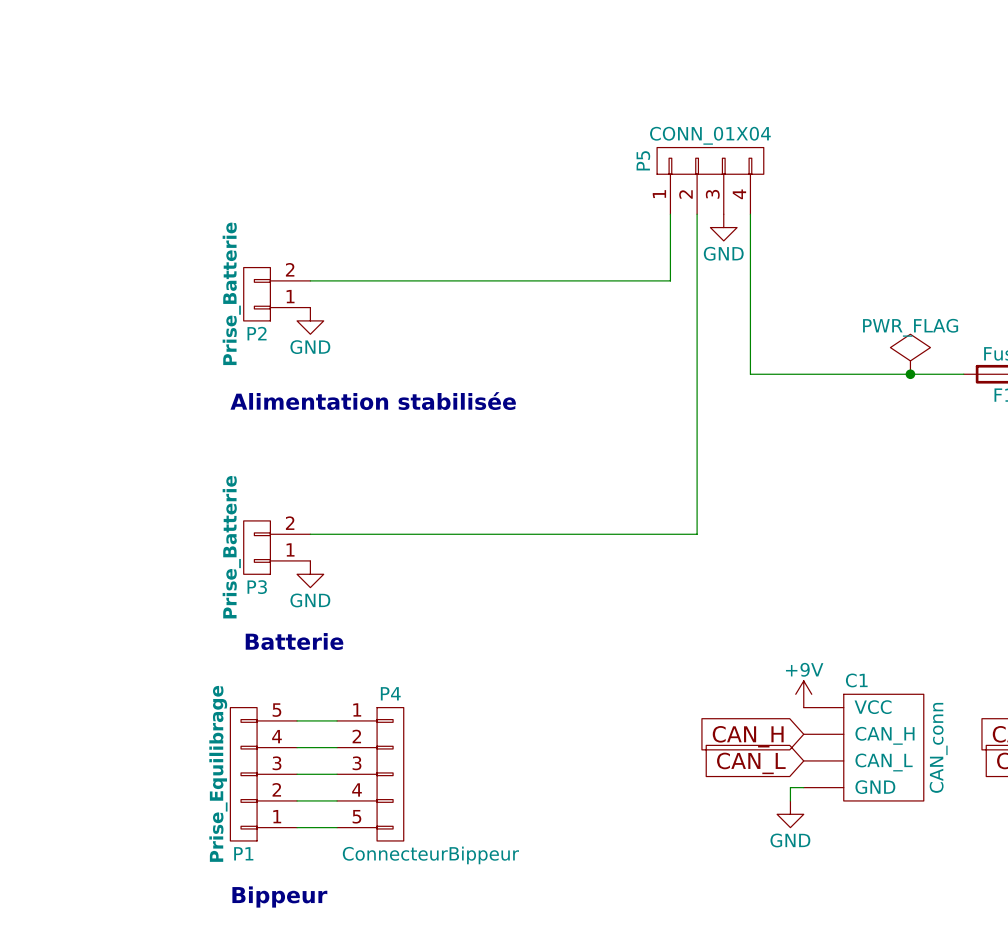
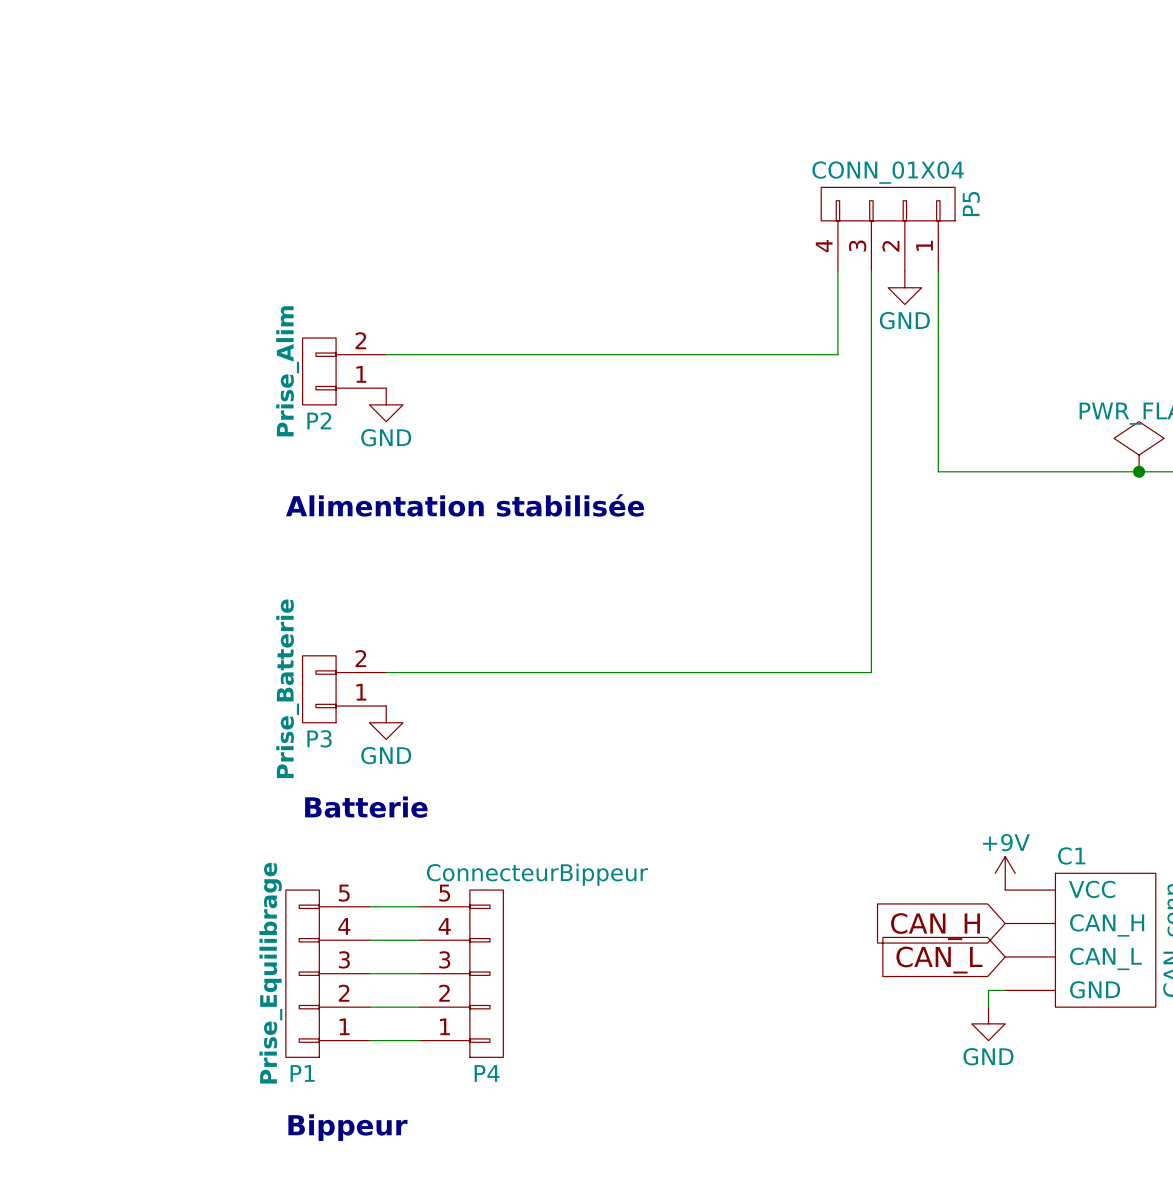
P5 flip: as is (710, 160) -> left-right (888, 204)
P2 value: Prise_Batterie (231, 293) -> Prise_Alim (287, 371)
P4 flip: as is (390, 774) -> up-down (486, 973)

